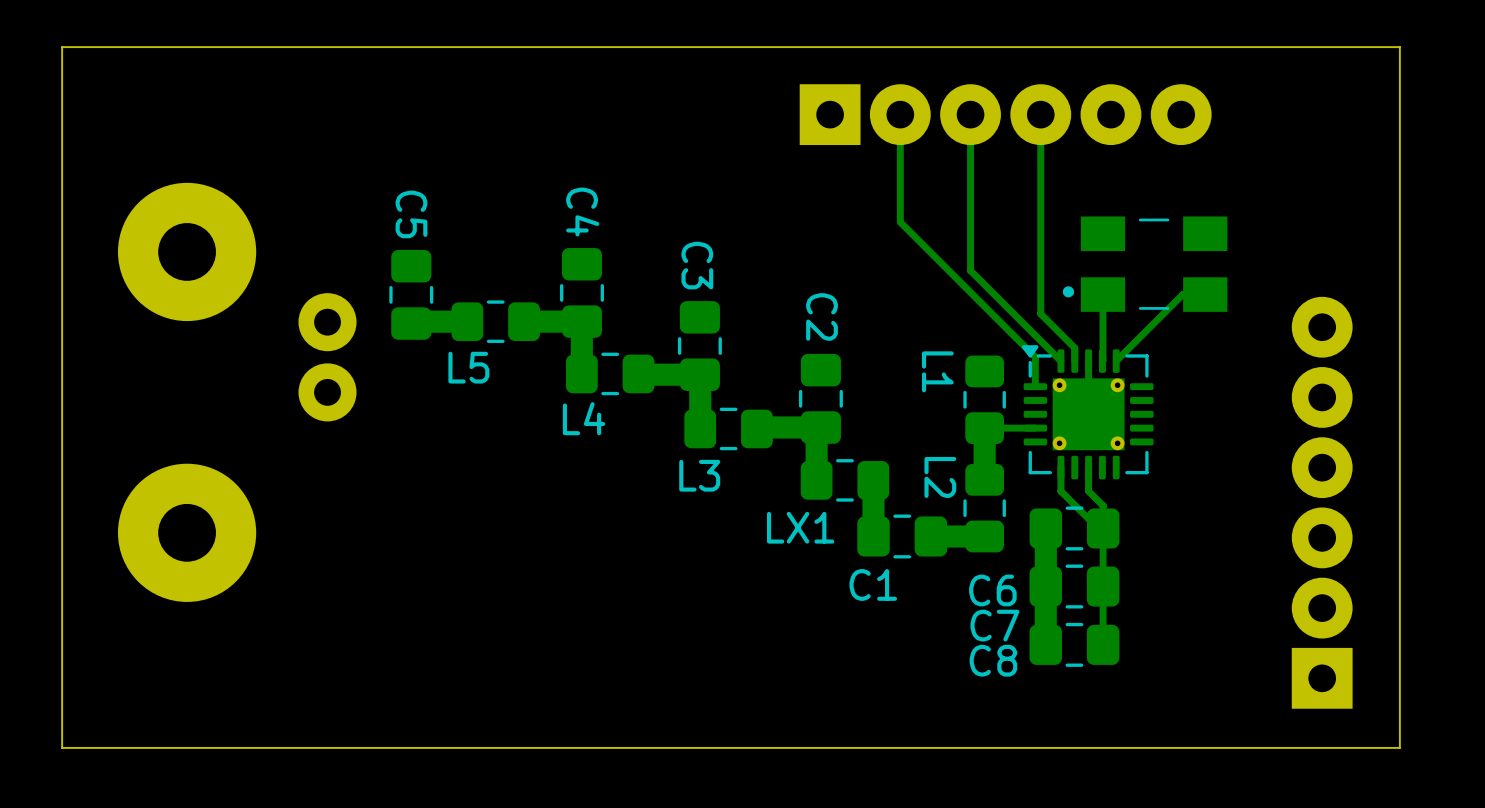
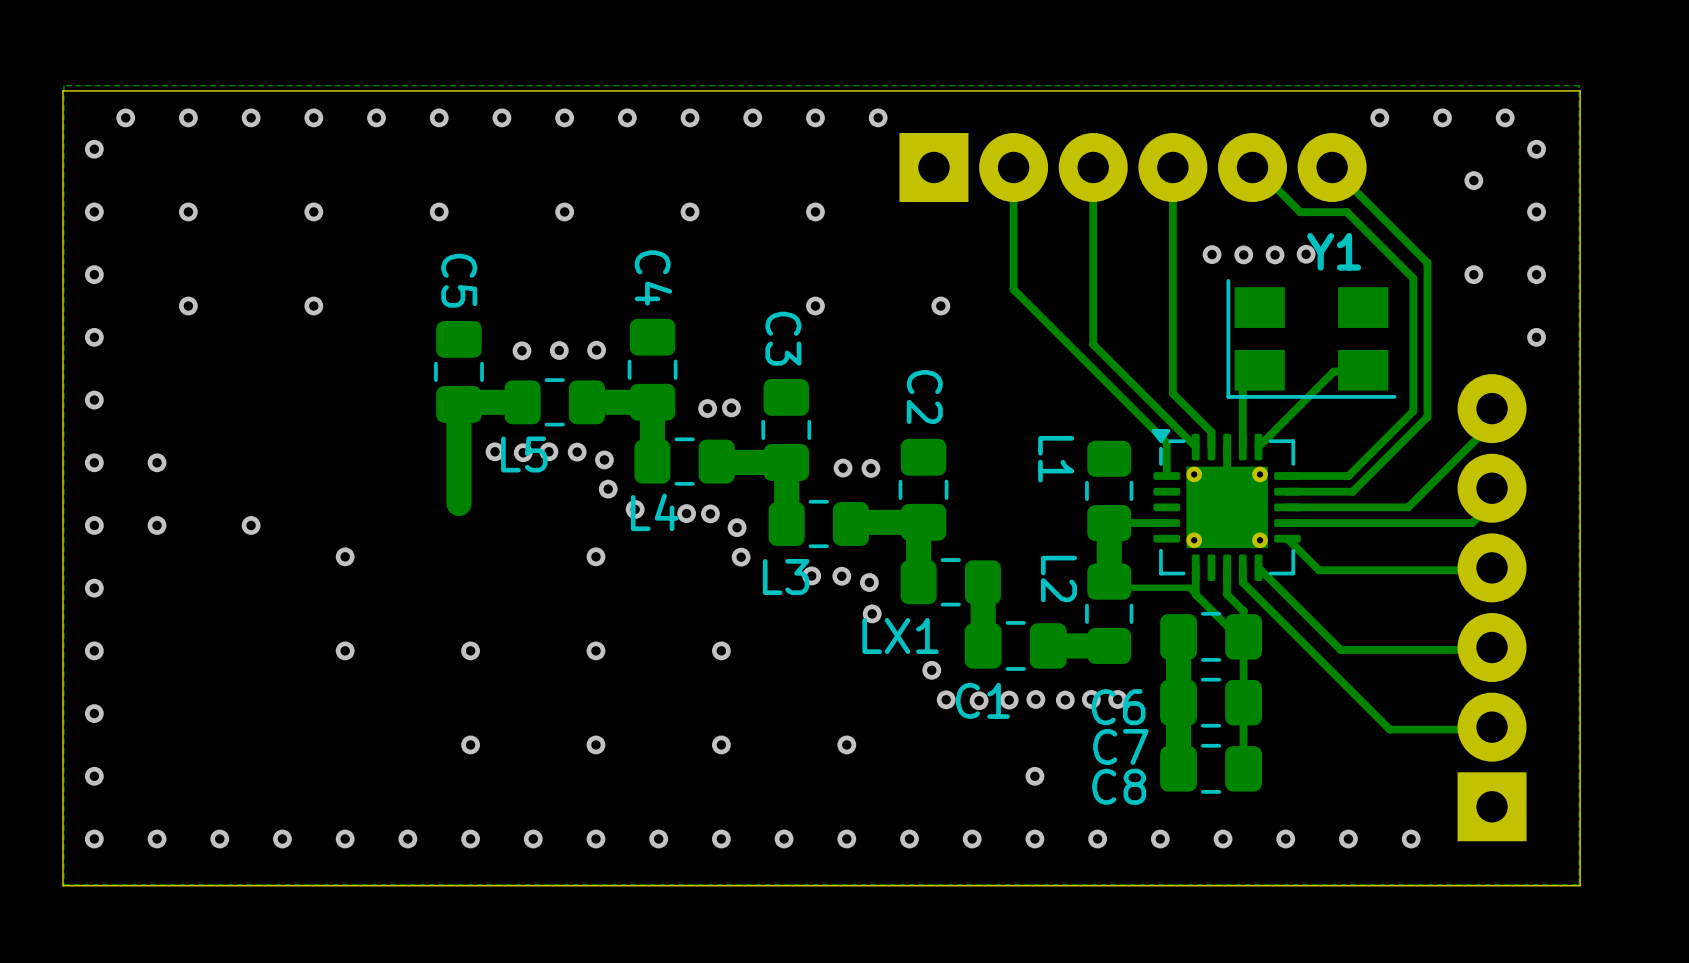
zone outline: none -> (1579, 85) (63, 85) (63, 884) (1579, 884) (1579, 85)
via: none -> (125, 117)
via: none -> (188, 117)
via: none -> (251, 117)
via: none -> (313, 117)
via: none -> (376, 117)
via: none -> (439, 117)
via: none -> (501, 117)
via: none -> (564, 117)
via: none -> (627, 117)
via: none -> (690, 117)
via: none -> (752, 117)
via: none -> (815, 117)
via: none -> (878, 117)
via: none -> (1379, 117)
via: none -> (1442, 117)
via: none -> (1505, 117)
via: none -> (94, 149)
via: none -> (1536, 149)
track: none -> (1252, 167) (1255, 167) (1300, 212) (1347, 212) (1413, 278) (1413, 411) (1348, 476) (1287, 476)
track: none -> (1332, 167) (1427, 262) (1427, 416) (1352, 491) (1287, 491)
via: none -> (1473, 180)
via: none -> (94, 211)
via: none -> (188, 211)
via: none -> (313, 211)
via: none -> (439, 211)
via: none -> (564, 211)
via: none -> (690, 211)
via: none -> (815, 211)
via: none -> (1536, 211)
via: none -> (1212, 254)
via: none -> (1243, 254)
via: none -> (1275, 254)
via: none -> (1306, 254)
via: none -> (94, 274)
via: none -> (1473, 274)
via: none -> (1536, 274)
via: none -> (188, 306)
via: none -> (313, 306)
via: none -> (815, 306)
via: none -> (940, 306)
via: none -> (94, 337)
part: (1145, 264) -> none
via: none -> (1536, 337)
Y1: none -> (1311, 338)
via: none -> (596, 350)
via: none -> (521, 350)
via: none -> (559, 350)
track: (1102, 294) (1102, 361) -> (1259, 370) (1242, 387) (1242, 447)
via: none -> (94, 400)
track: none -> (458, 404) (458, 503)
via: none -> (731, 407)
via: none -> (707, 408)
track: none -> (1504, 411) (1408, 507) (1287, 507)
via: none -> (495, 451)
via: none -> (548, 451)
via: none -> (577, 452)
via: none -> (523, 452)
via: none -> (604, 459)
via: none -> (94, 462)
via: none -> (157, 462)
via: none -> (843, 468)
via: none -> (870, 468)
part: (237, 392) -> none
via: none -> (608, 489)
track: none -> (1504, 490) (1472, 523) (1287, 523)
via: none -> (635, 509)
via: none -> (686, 513)
via: none -> (710, 513)
via: none -> (94, 525)
via: none -> (157, 525)
via: none -> (251, 525)
via: none -> (737, 527)
track: none -> (1287, 538) (1319, 570) (1504, 570)
via: none -> (345, 556)
via: none -> (595, 556)
via: none -> (741, 557)
track: none -> (1242, 567) (1242, 582) (1389, 729) (1504, 729)
track: none -> (1258, 567) (1340, 649) (1504, 649)
via: none -> (811, 575)
via: none -> (841, 576)
via: none -> (869, 582)
via: none -> (94, 588)
track: none -> (1112, 587) (1189, 587) (1195, 594)
via: none -> (872, 613)
via: none -> (94, 650)
via: none -> (345, 650)
via: none -> (470, 650)
via: none -> (595, 650)
via: none -> (721, 650)
via: none -> (931, 670)
via: none -> (946, 699)
via: none -> (1035, 699)
via: none -> (1091, 699)
via: none -> (1117, 699)
via: none -> (979, 700)
via: none -> (1009, 700)
via: none -> (1065, 700)
via: none -> (94, 713)
via: none -> (470, 744)
via: none -> (595, 744)
via: none -> (721, 744)
via: none -> (846, 744)
via: none -> (94, 776)
via: none -> (1034, 776)
via: none -> (94, 838)
via: none -> (157, 838)
via: none -> (219, 838)
via: none -> (282, 838)
via: none -> (345, 838)
via: none -> (407, 838)
via: none -> (470, 838)
via: none -> (533, 838)
via: none -> (595, 838)
via: none -> (658, 838)
via: none -> (721, 838)
via: none -> (784, 838)
via: none -> (846, 838)
via: none -> (909, 838)
via: none -> (972, 838)
via: none -> (1034, 838)
via: none -> (1097, 838)
via: none -> (1160, 838)
via: none -> (1223, 838)
via: none -> (1285, 838)
via: none -> (1348, 838)
via: none -> (1411, 838)

